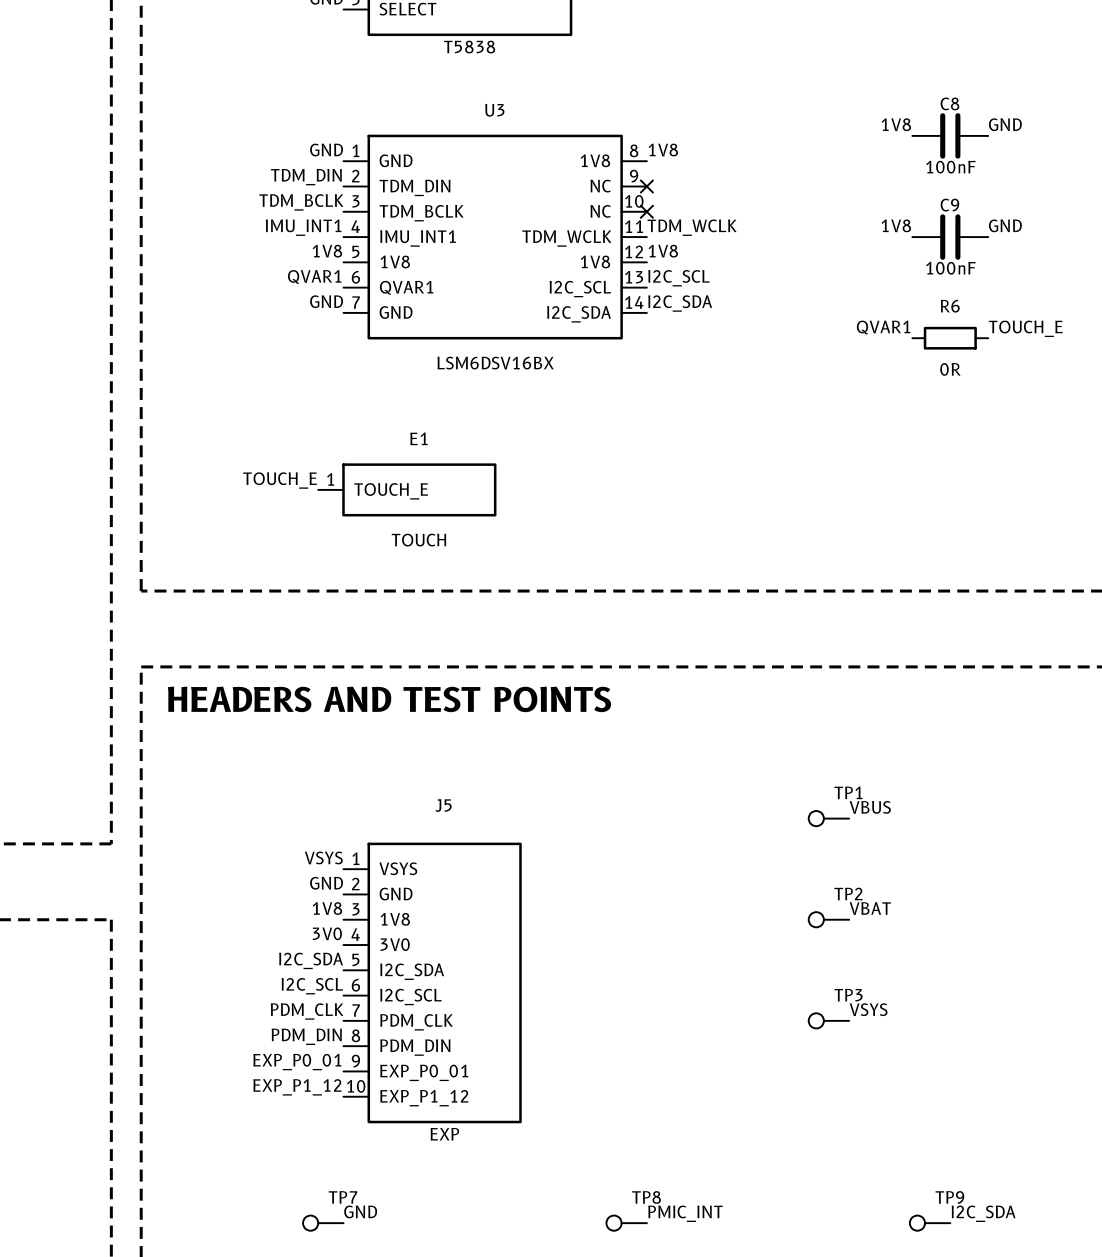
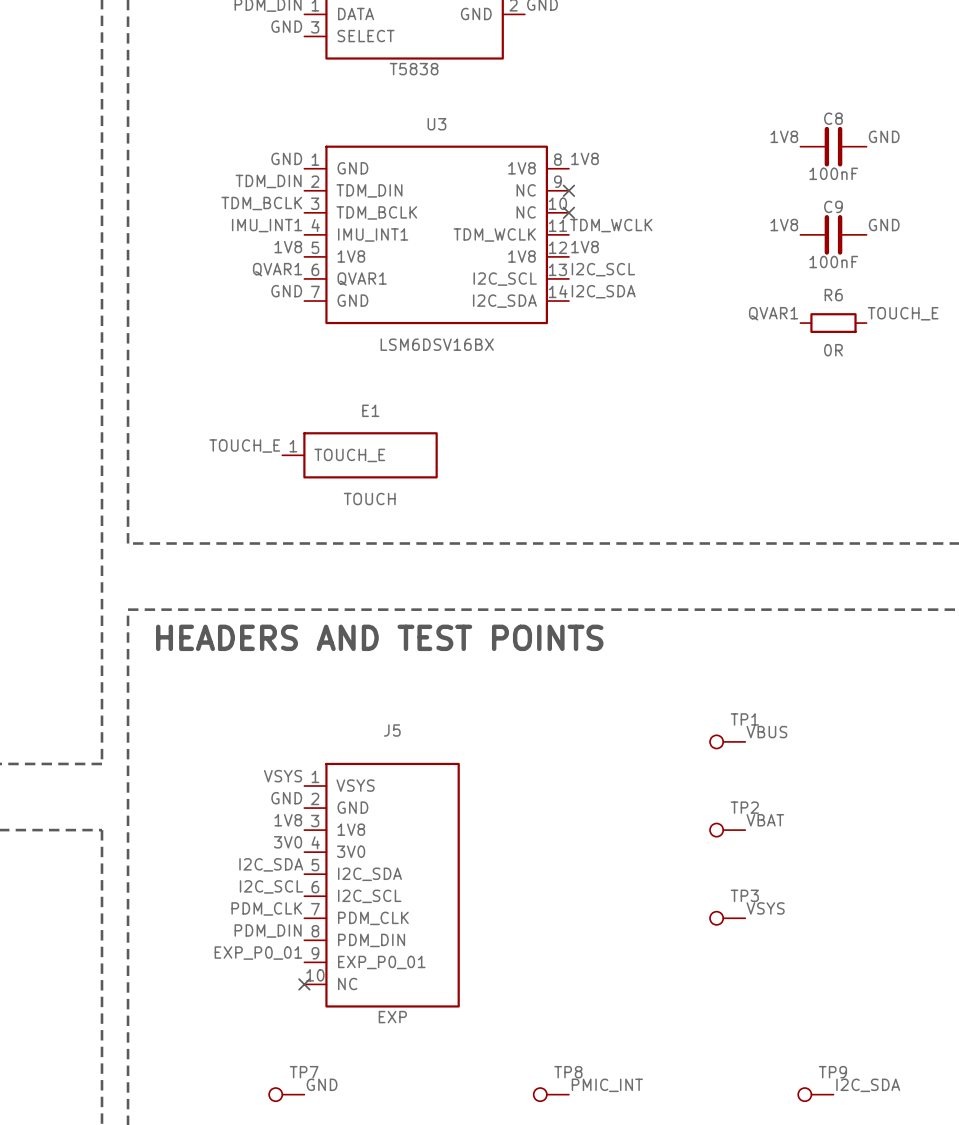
label: EXP_P1_12 (297, 1087) -> none
no-connect mark: none -> (304, 984)
J5 pin name: EXP_P1_12 (424, 1098) -> NC (347, 984)

